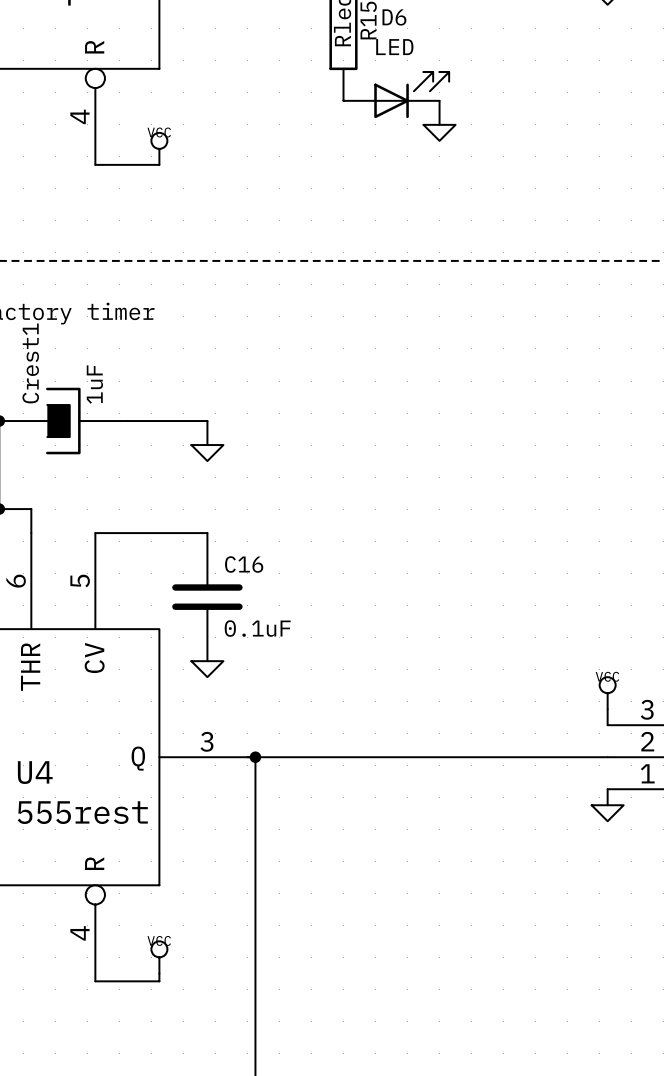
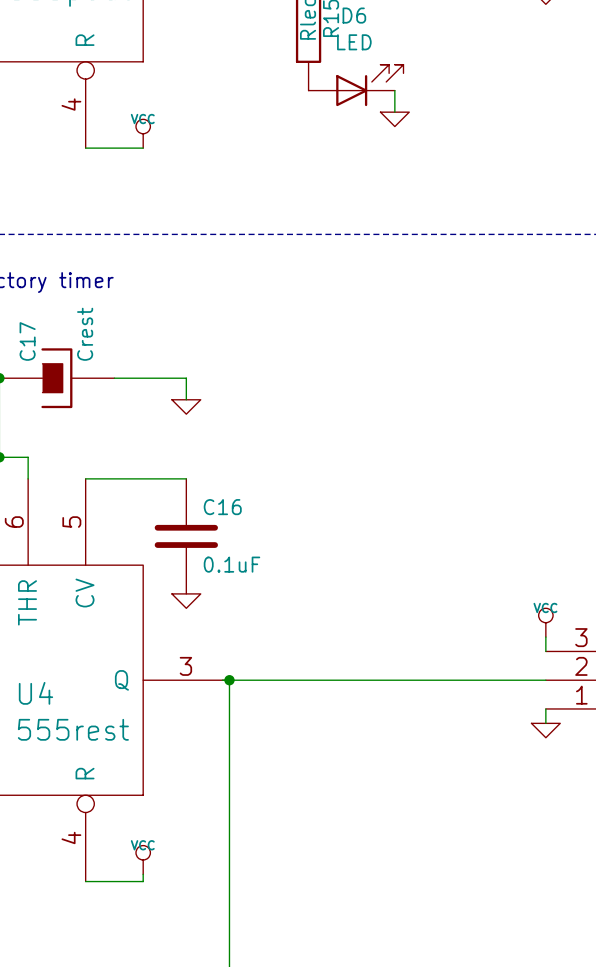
Crest1 name: Crest1 (30, 363) -> C17 (27, 341)
Crest1 value: 1uF (94, 384) -> Crest (85, 334)

